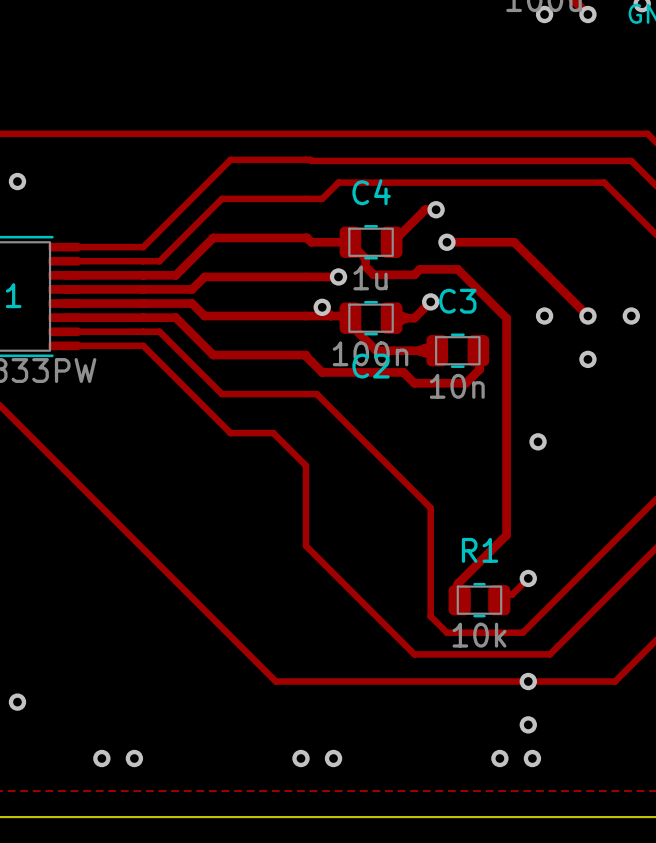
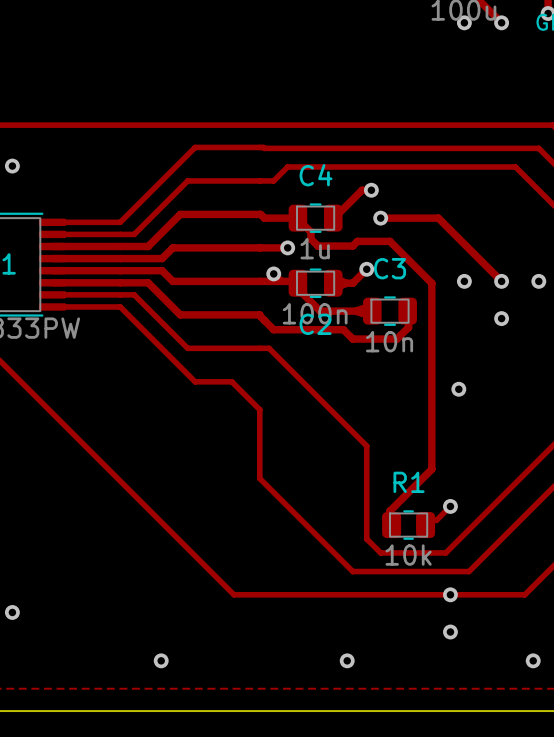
via: (101, 758) -> none
via: (134, 758) -> none
via: none -> (161, 660)
via: (300, 758) -> none
via: (333, 758) -> none
via: none -> (347, 660)
via: (499, 758) -> none
via: (532, 758) -> none
via: none -> (533, 660)

